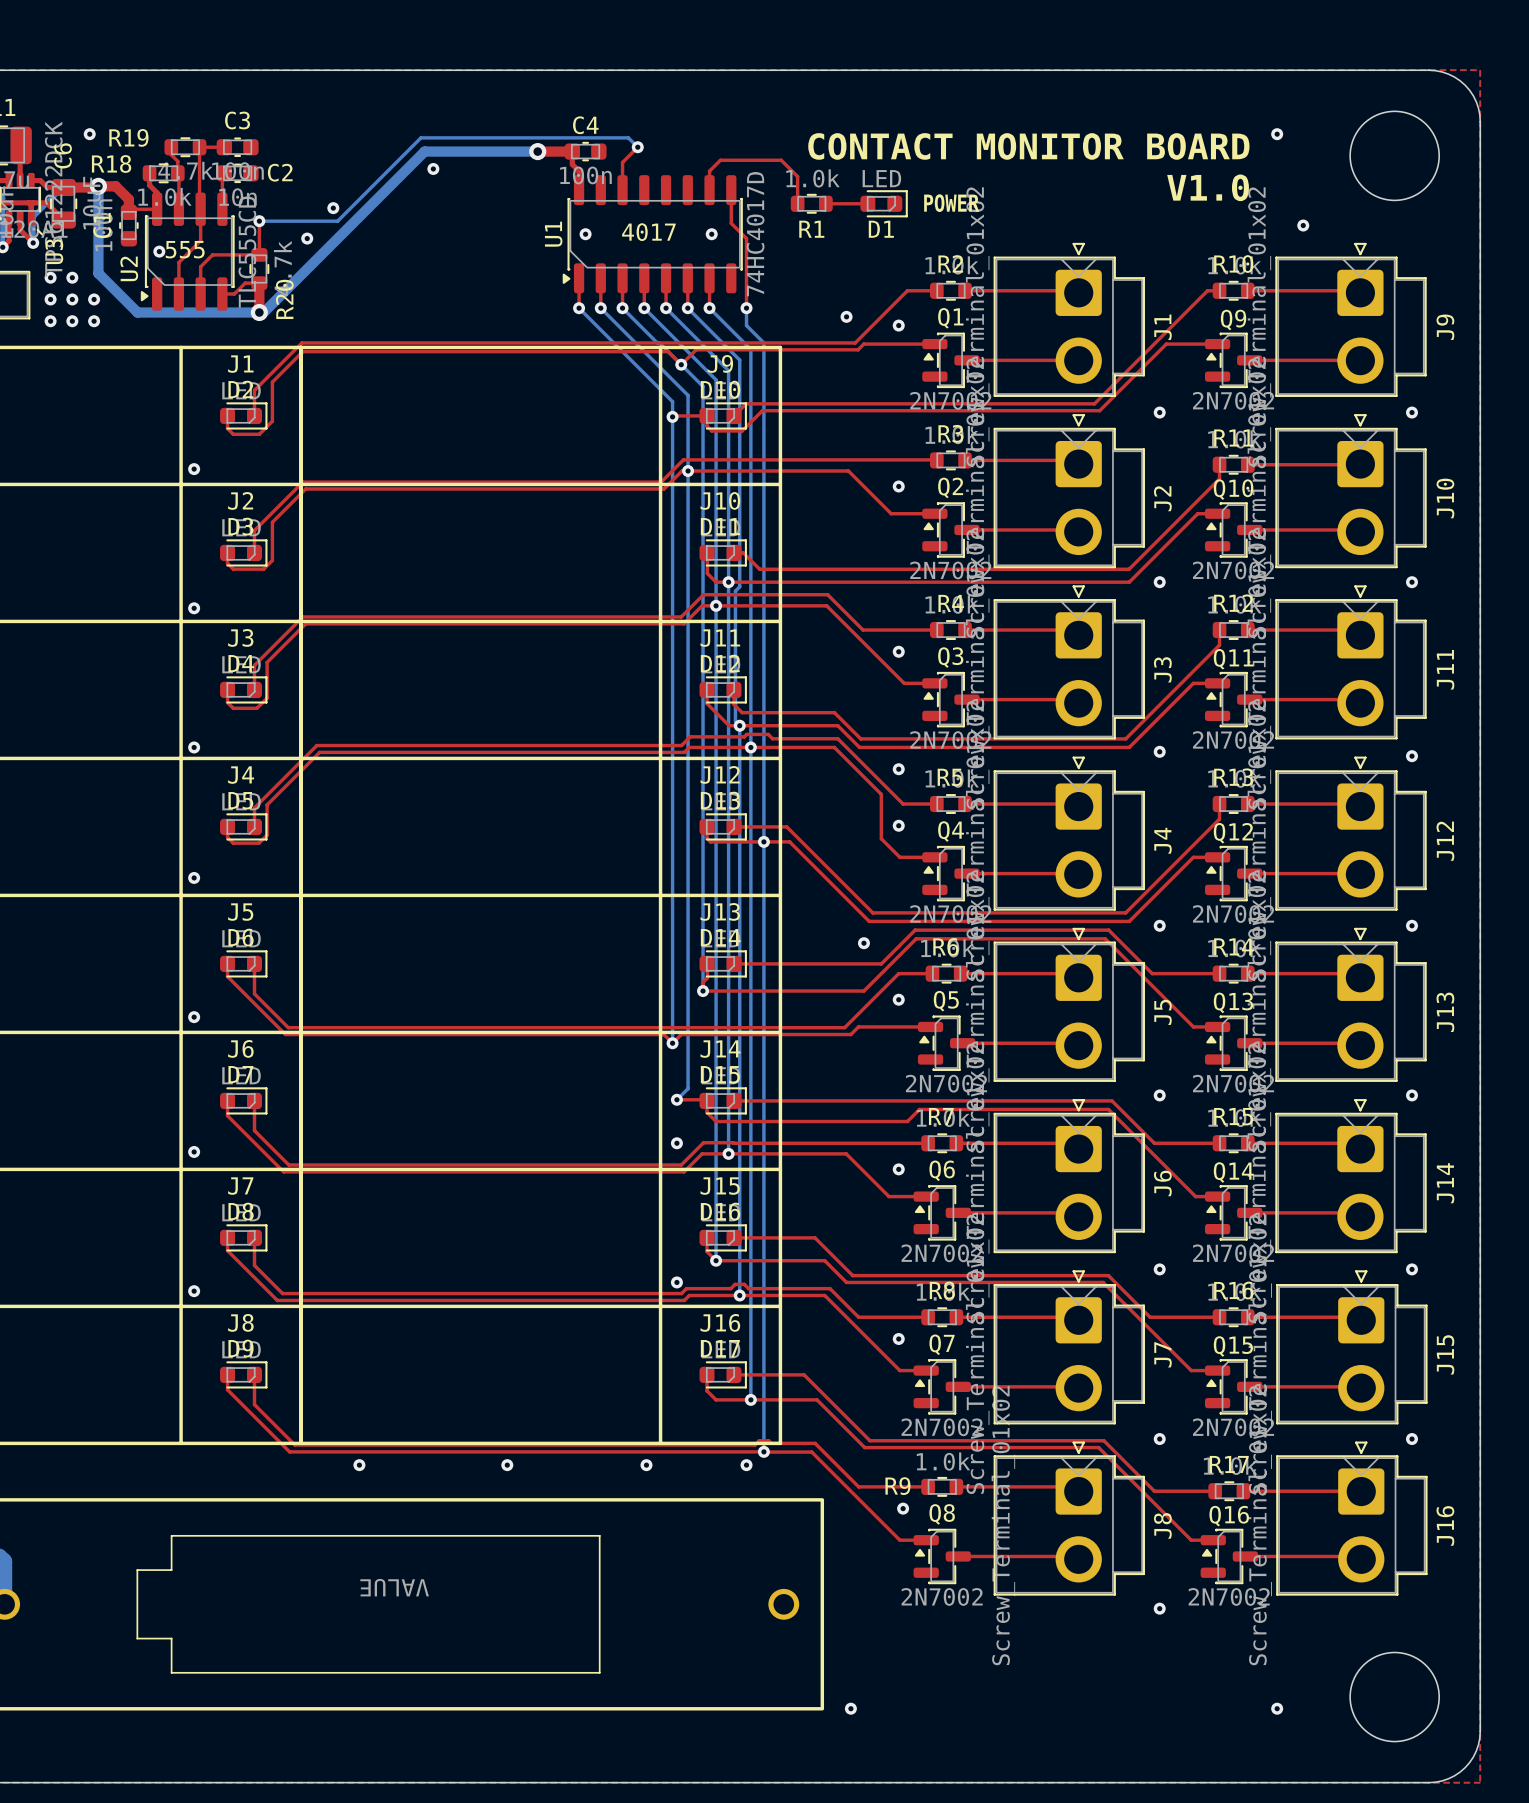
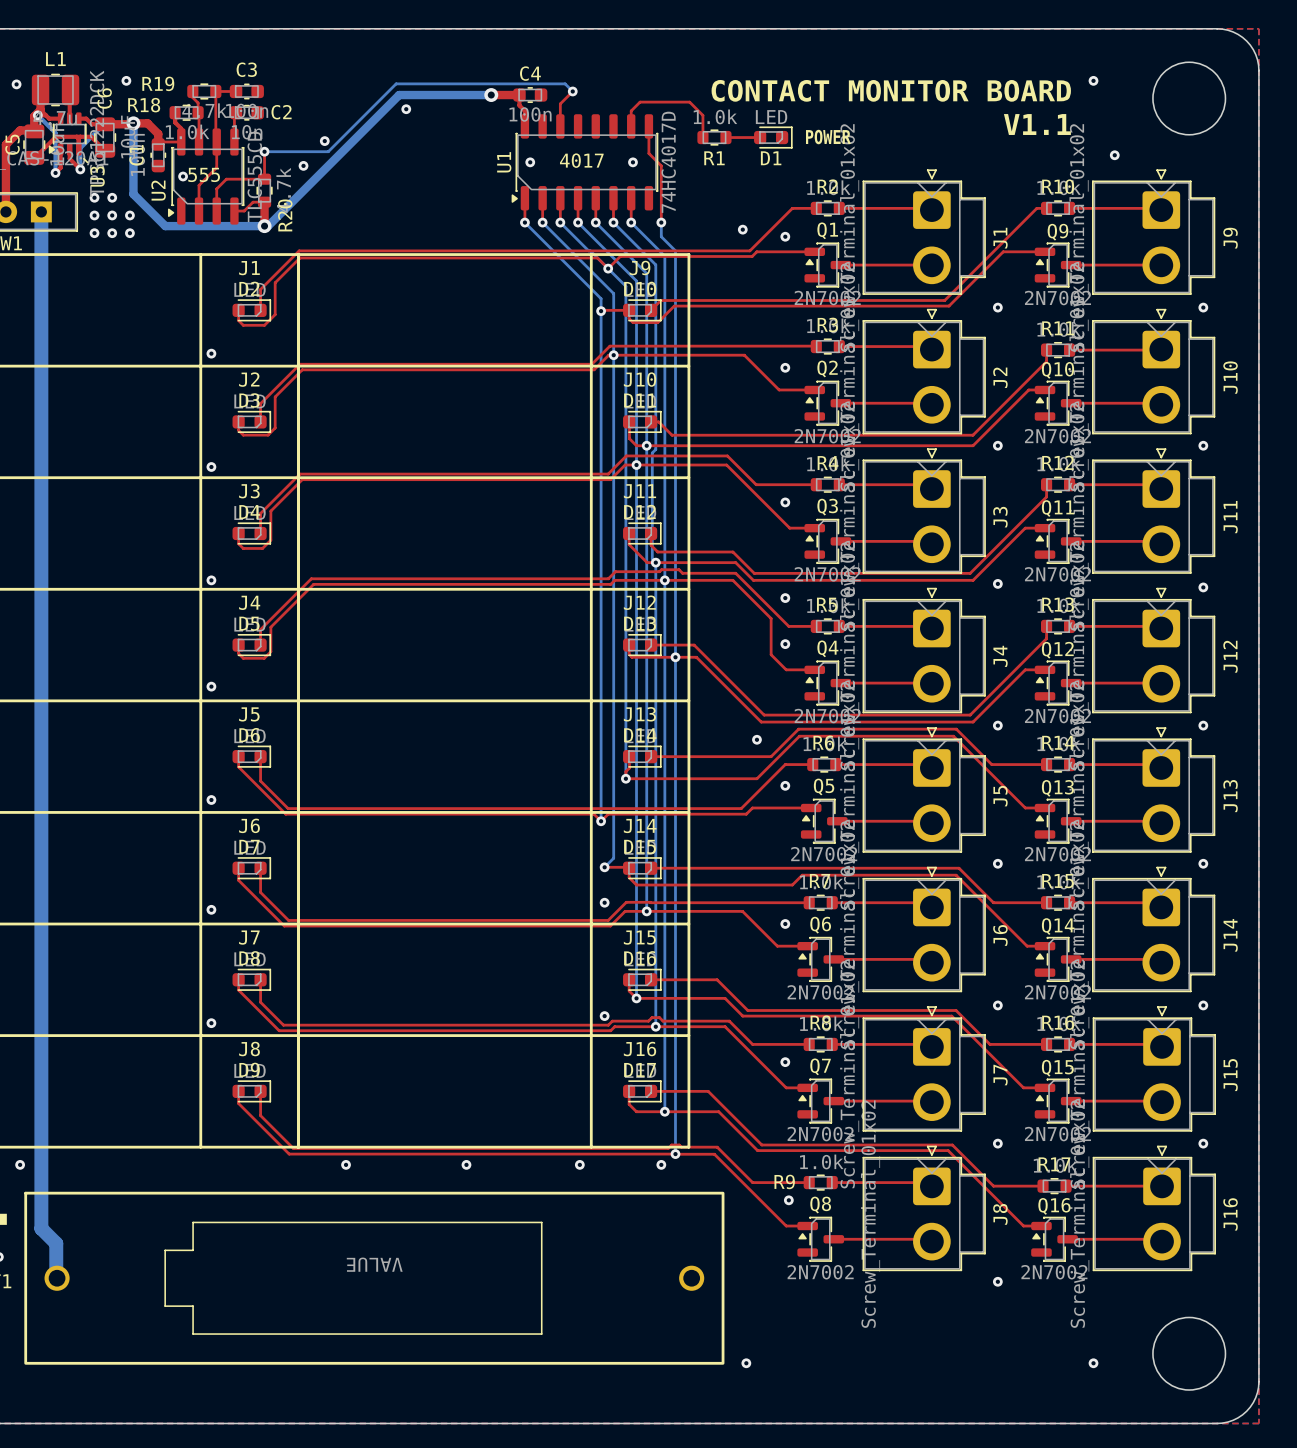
text: V1.0 (1208, 187) -> V1.1 (1037, 124)

